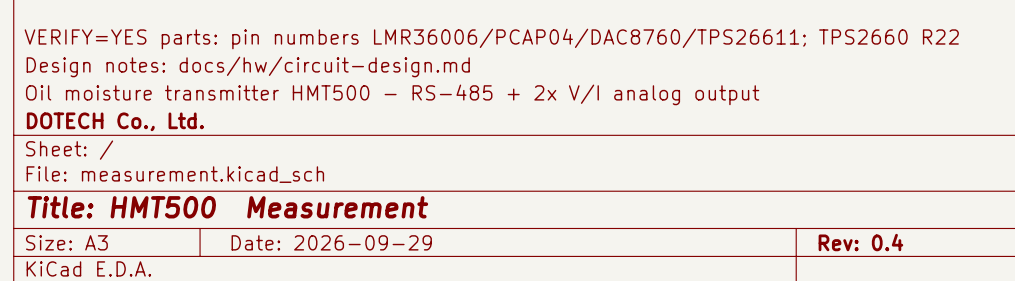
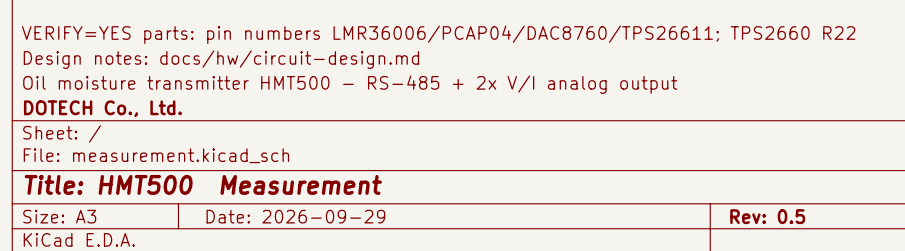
title block: Rev: 0.4 (860, 242) -> Rev: 0.5 (767, 216)

